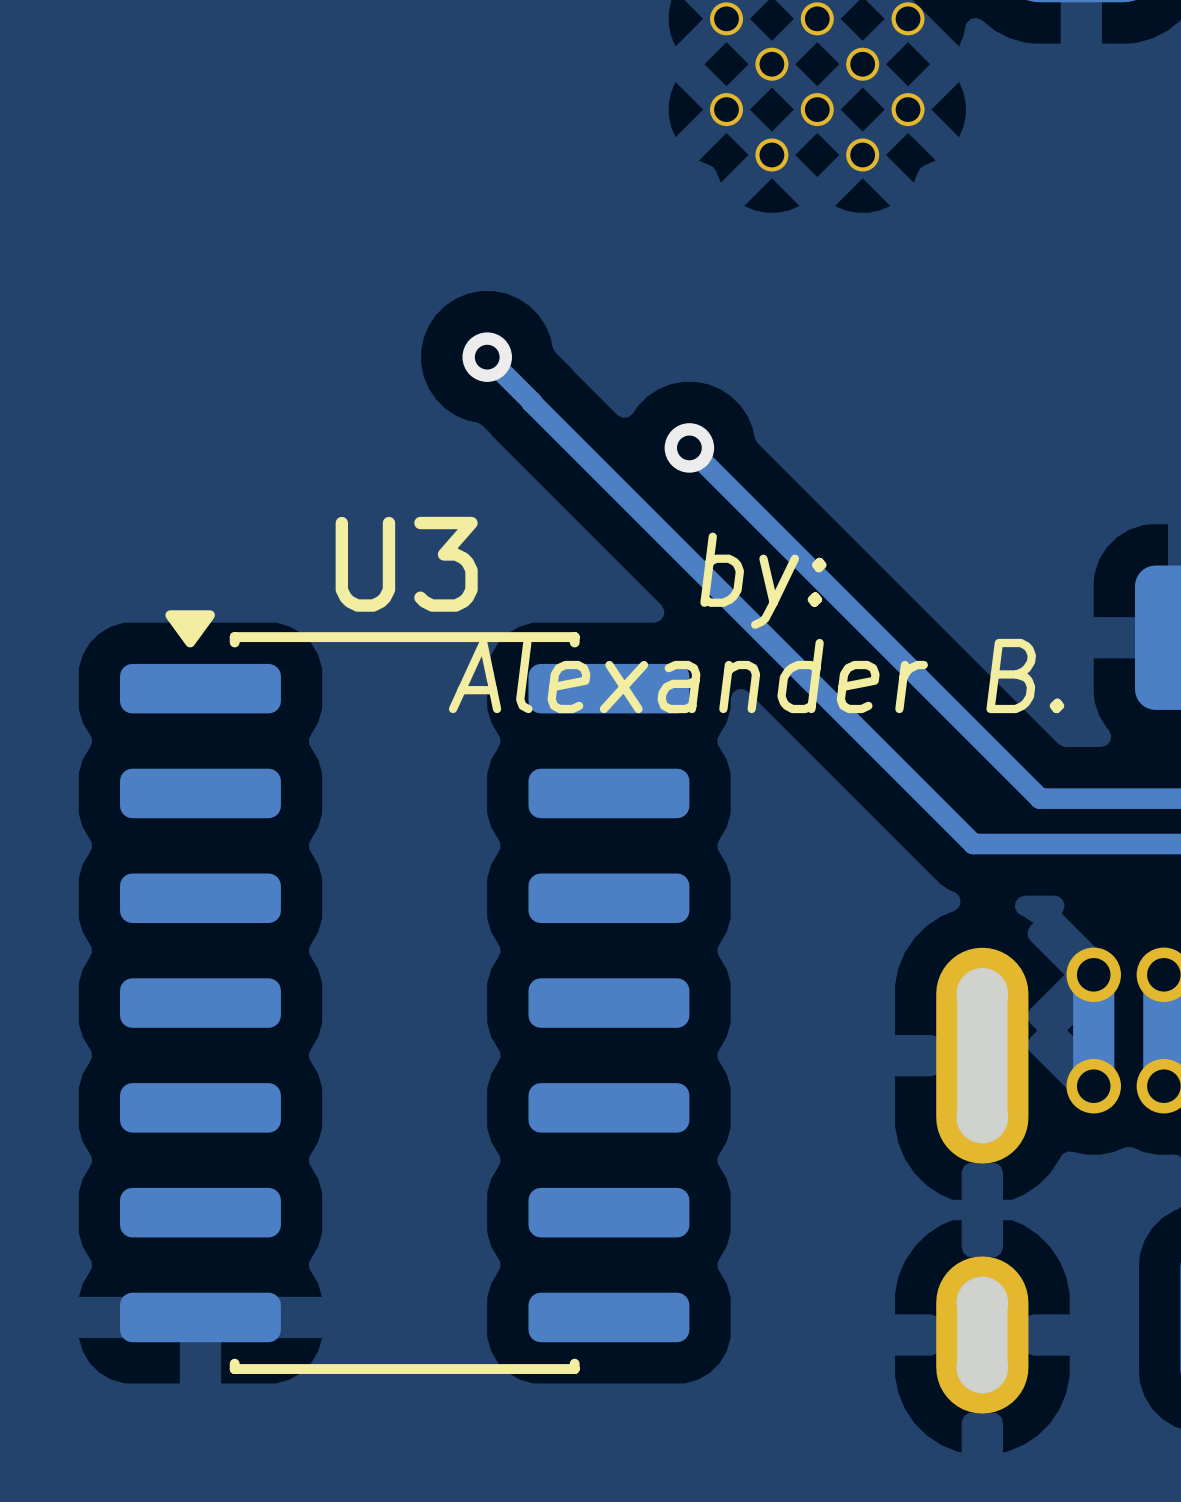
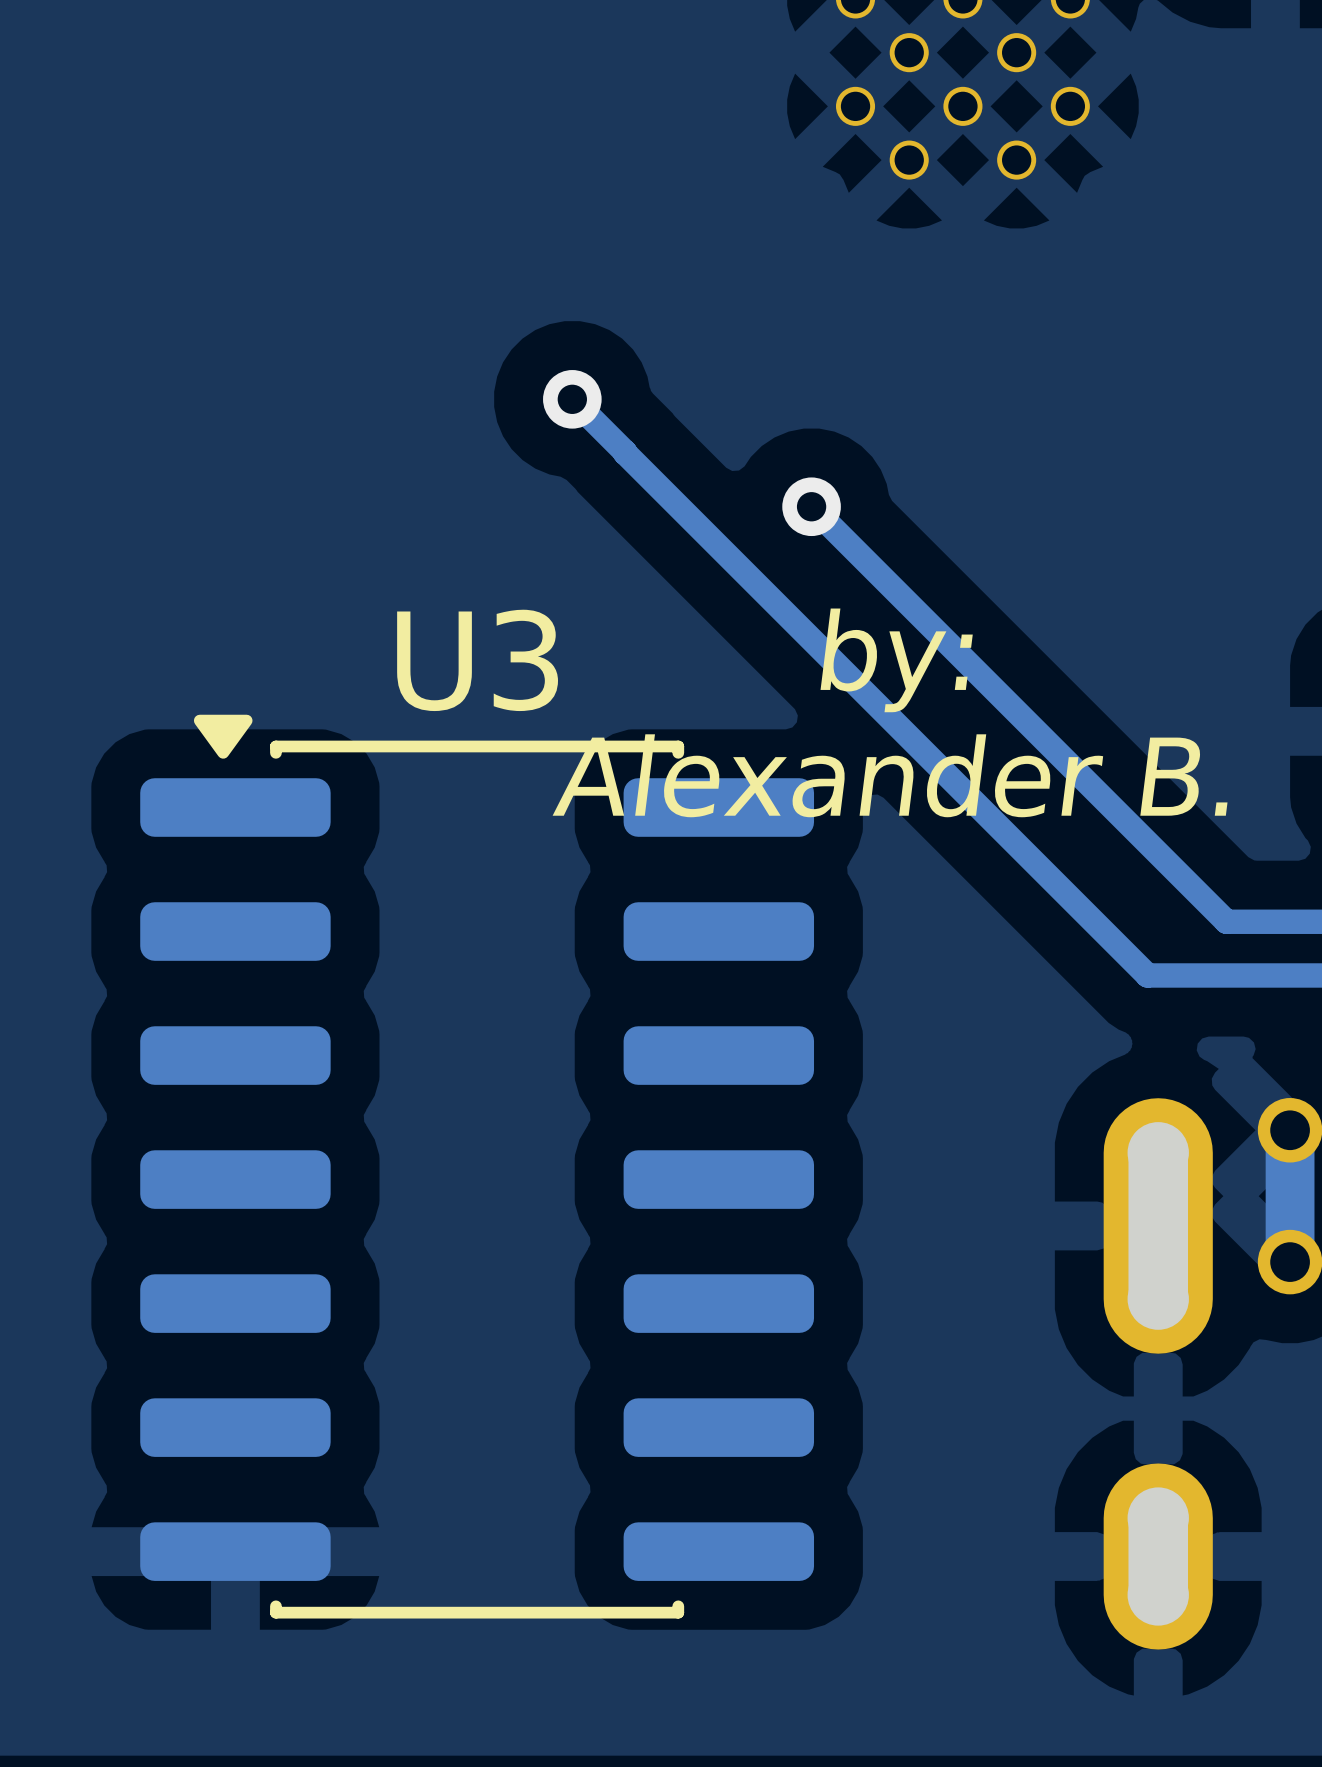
U3 position: (404, 992) -> (477, 1166)

